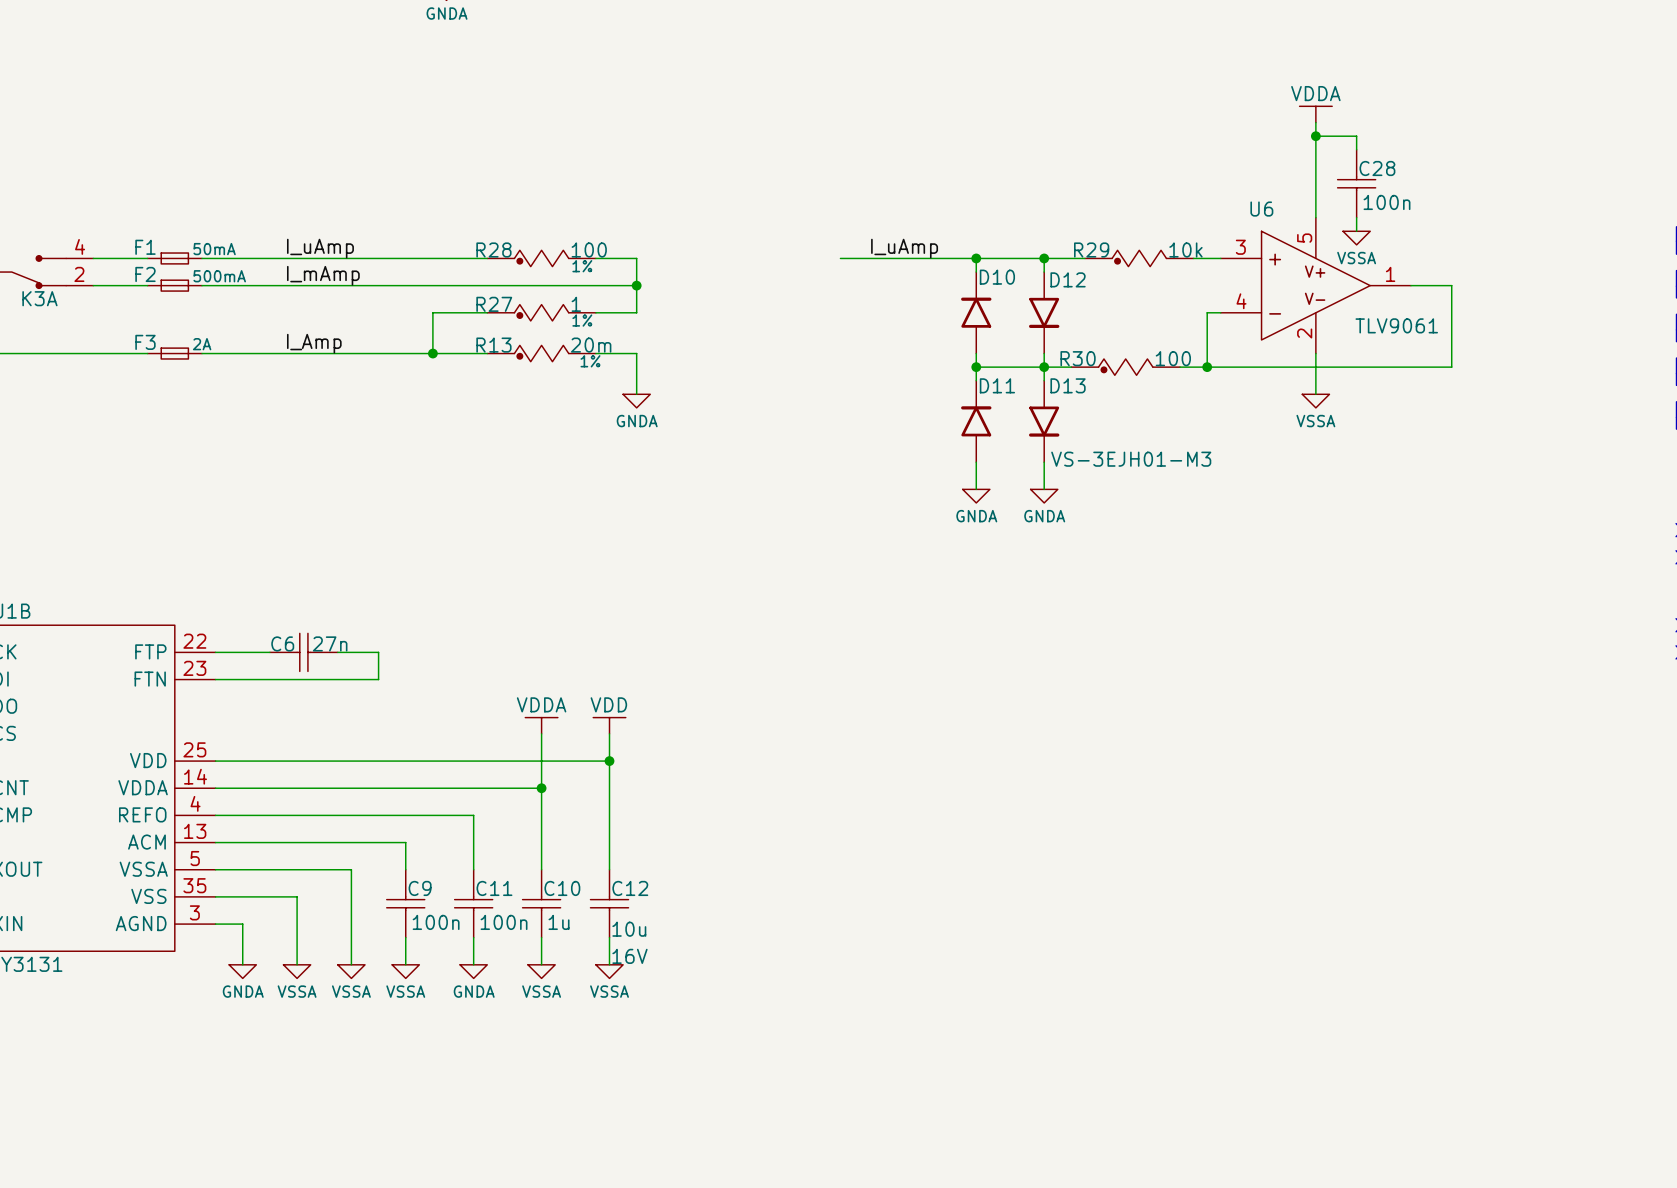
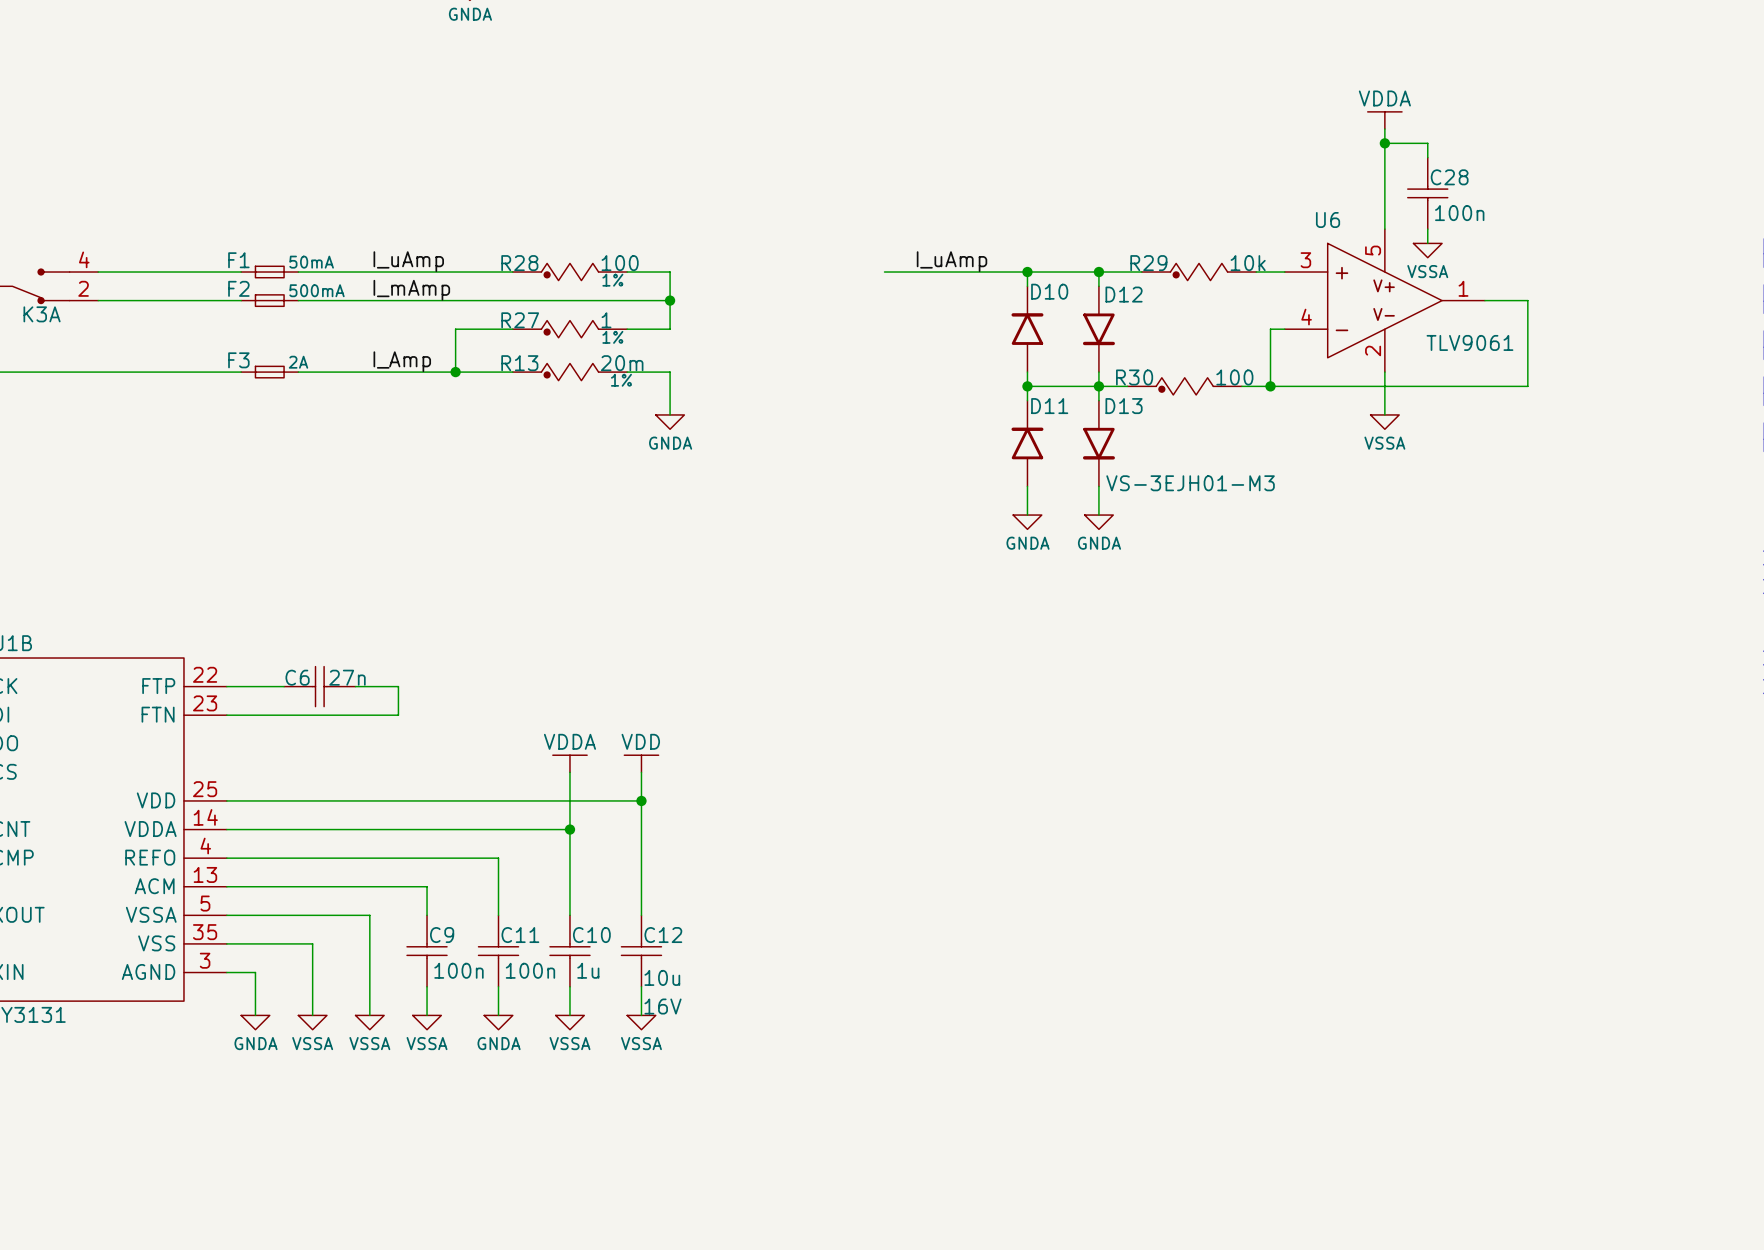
label position: I_uAmp (320, 248) -> I_uAmp (408, 261)
F1 position: (174, 258) -> (269, 272)
label position: I_mAmp (323, 275) -> I_mAmp (411, 290)
F2 position: (174, 285) -> (269, 300)
label position: I_Amp (314, 343) -> I_Amp (402, 361)
F3 position: (174, 353) -> (269, 372)

